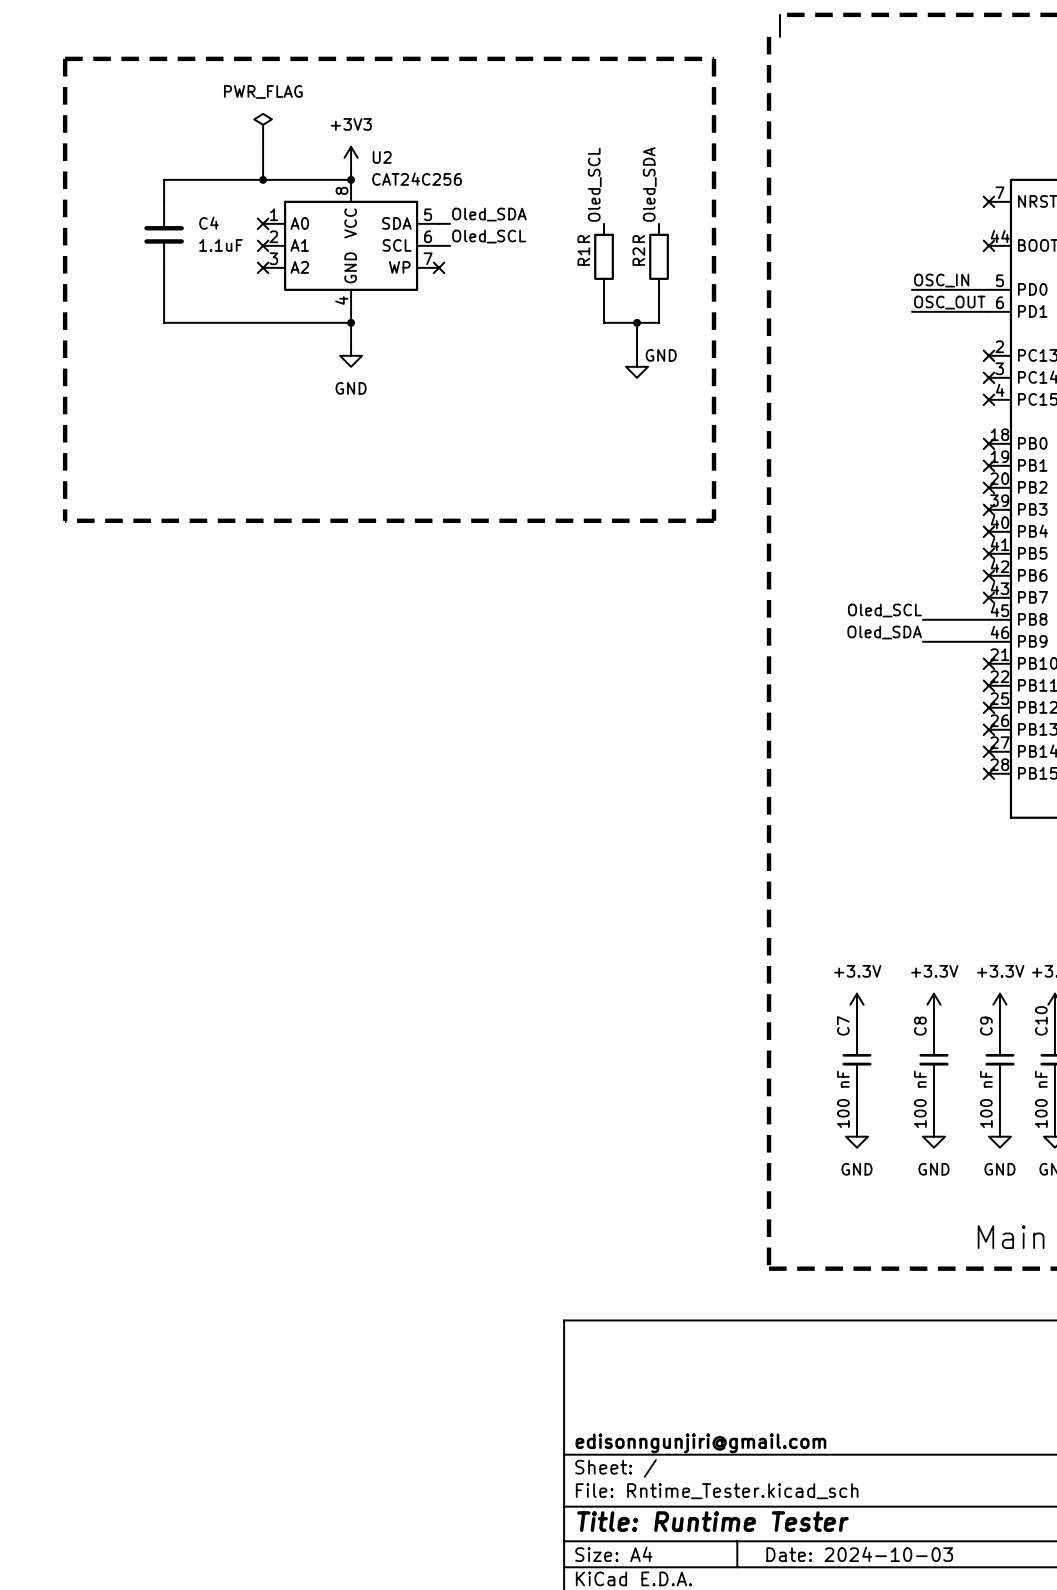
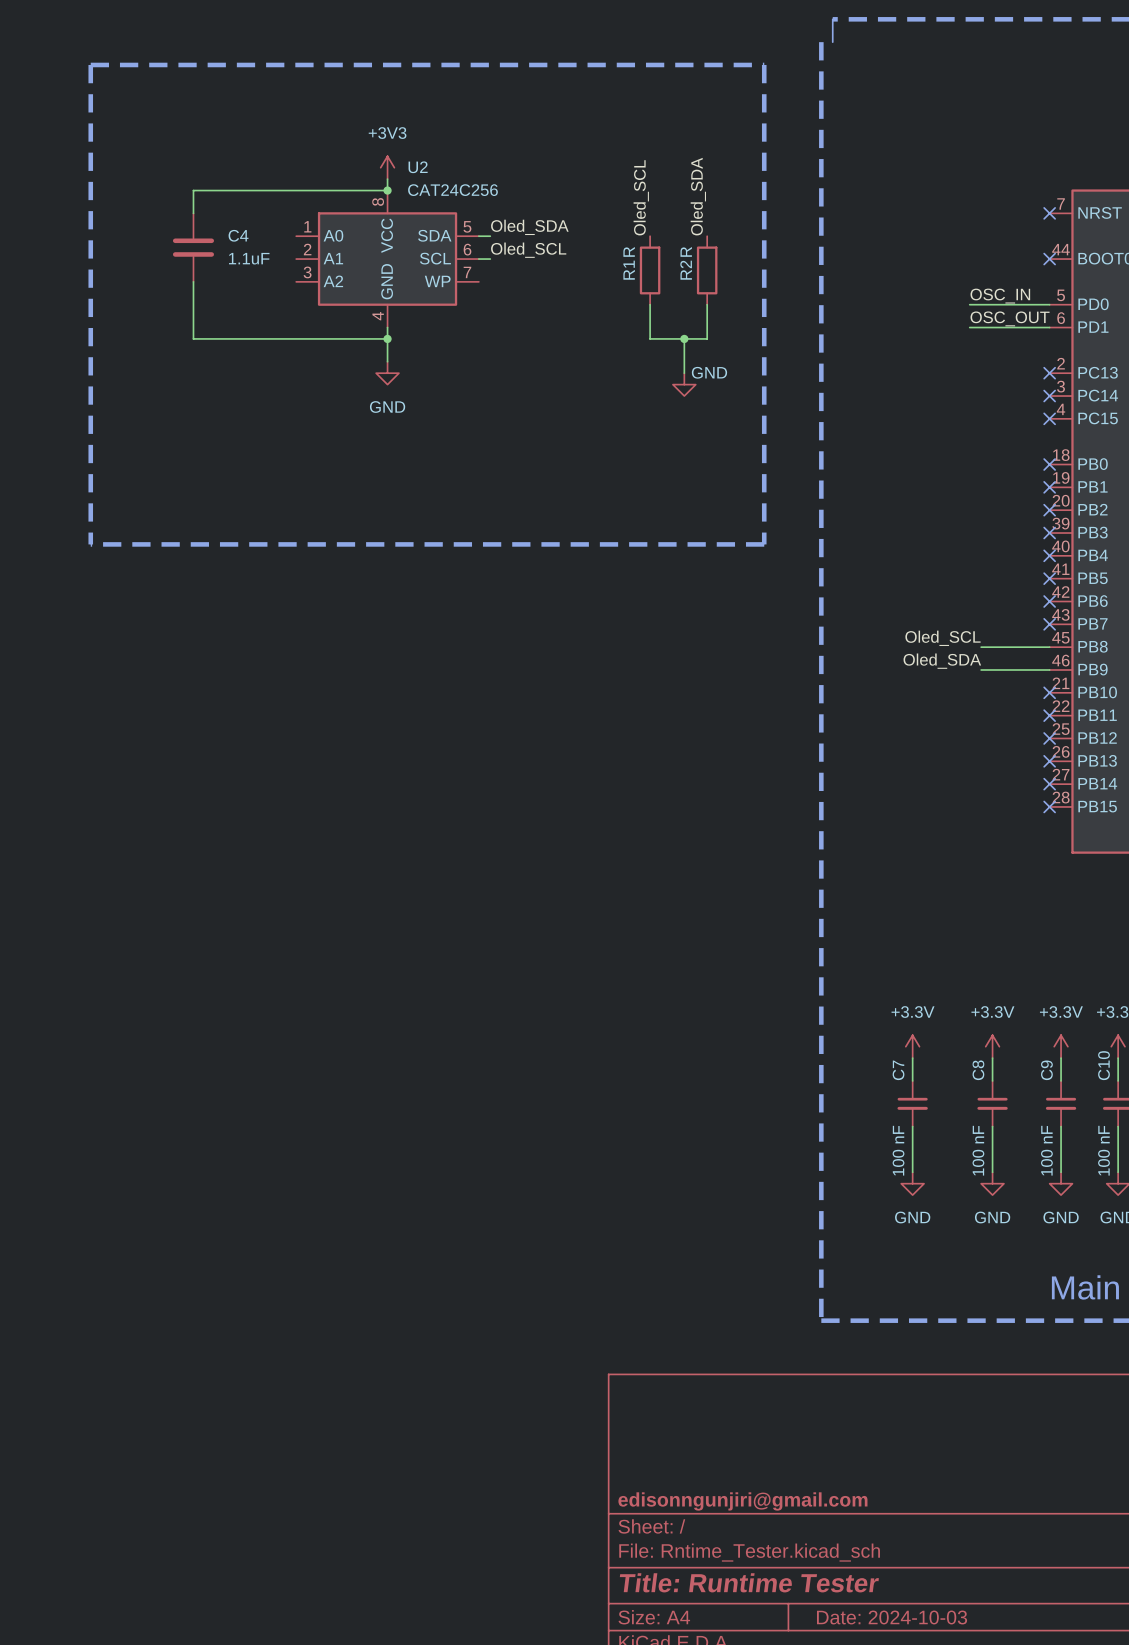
power symbol: PWR_FLAG (263, 124) -> none
wire: (263, 135) (263, 179) -> none
junction: (263, 179) -> none
no-connect mark: (263, 223) -> none
no-connect mark: (263, 245) -> none
no-connect mark: (263, 267) -> none
no-connect mark: (439, 267) -> none

